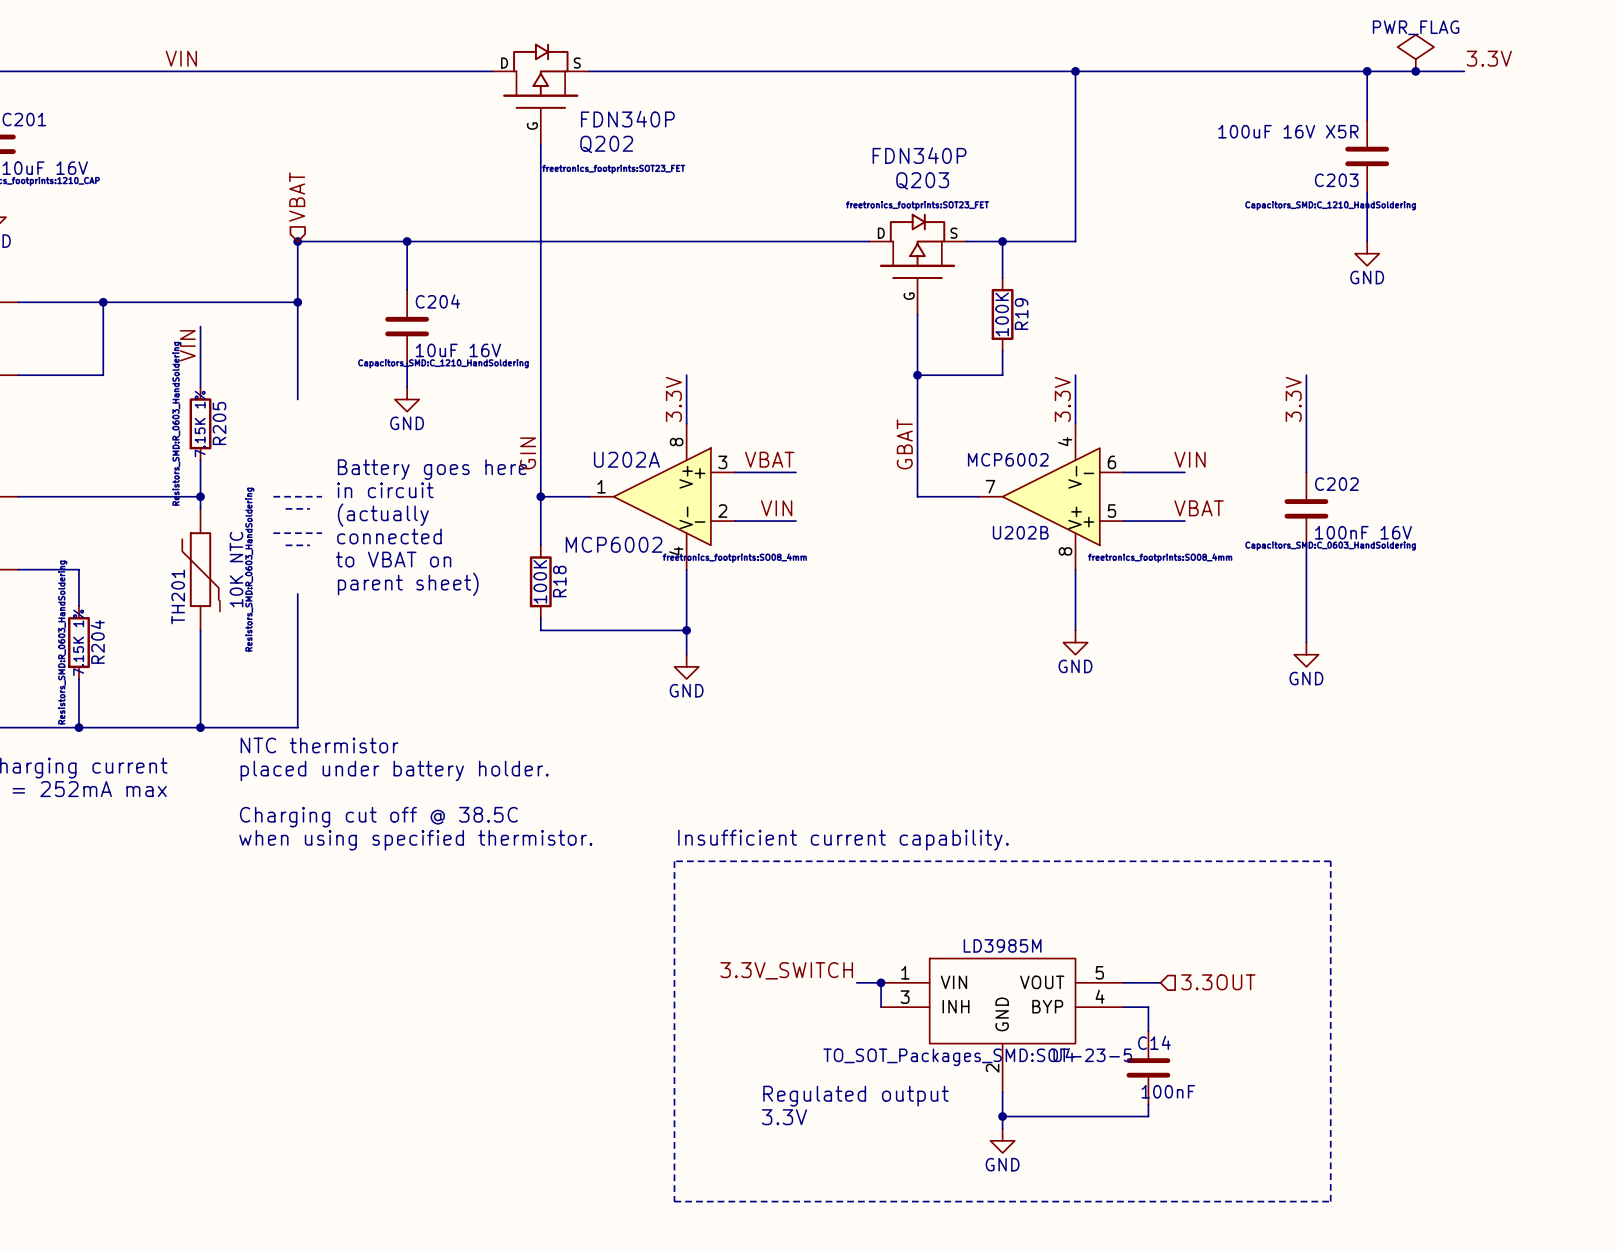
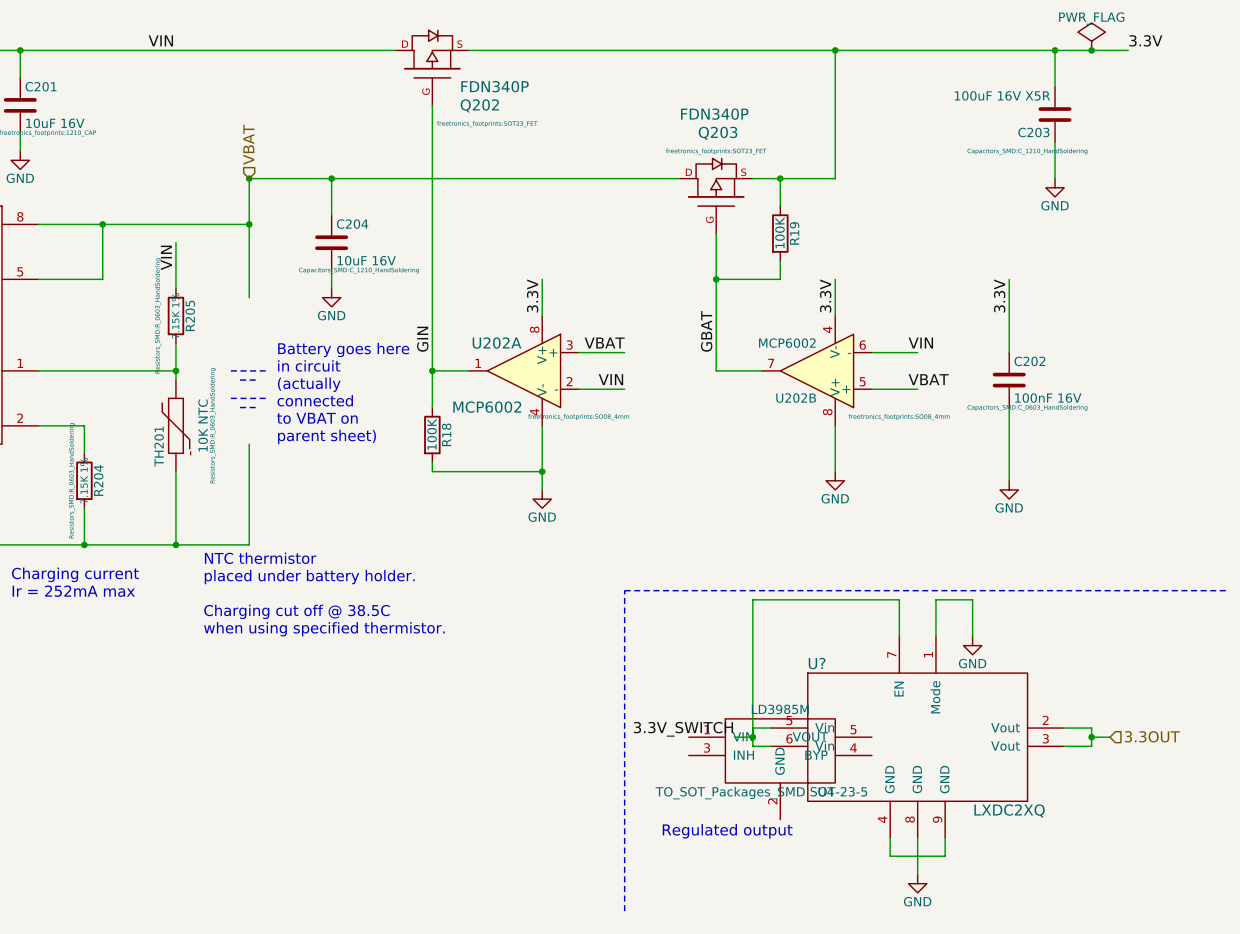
line: none -> (1228, 590) (624, 590) (624, 911)
text: Insufficient current capability. (843, 840) -> none
wire: none -> (899, 636) (899, 599) (752, 599) (752, 746) (771, 746)
wire: none -> (935, 636) (935, 599) (972, 599) (972, 636)
line: (674, 861) (674, 1201) (1330, 1201) (1330, 861) (674, 861) -> none
power symbol: none -> GND (972, 645)
label position: 3.3V_SWITCH (786, 970) -> 3.3V_SWITCH (683, 729)
wire: none -> (752, 728) (771, 728)
wire: none -> (1064, 728) (1091, 728) (1091, 746) (1064, 746)
wire: (856, 982) (881, 982) (881, 1007) -> none
junction: (881, 982) -> none
wire: none -> (734, 737) (752, 737)
junction: none -> (752, 737)
wire: (1124, 982) (1160, 982) -> none
U?: none -> LXDC2XQ (917, 737)
hierarchical label: 3.3OUT (1218, 982) -> none
wire: none -> (1091, 737) (1109, 737)
junction: none -> (1091, 737)
hierarchical label: none -> 3.3OUT (1152, 736)
wire: (1124, 1007) (1148, 1007) (1148, 1031) -> none
C14: 100nF (1148, 1067) -> none
wire: (1002, 1092) (1002, 1128) -> none
text position: Regulated output (855, 1096) -> Regulated output (727, 831)
wire: (1148, 1104) (1148, 1116) (1002, 1116) -> none
junction: (1002, 1116) -> none
wire: none -> (890, 837) (890, 856) (945, 856) (945, 837)
wire: none -> (917, 837) (917, 874)
text: 3.3V (784, 1117) -> none
power symbol position: GND (1002, 1140) -> GND (917, 883)

